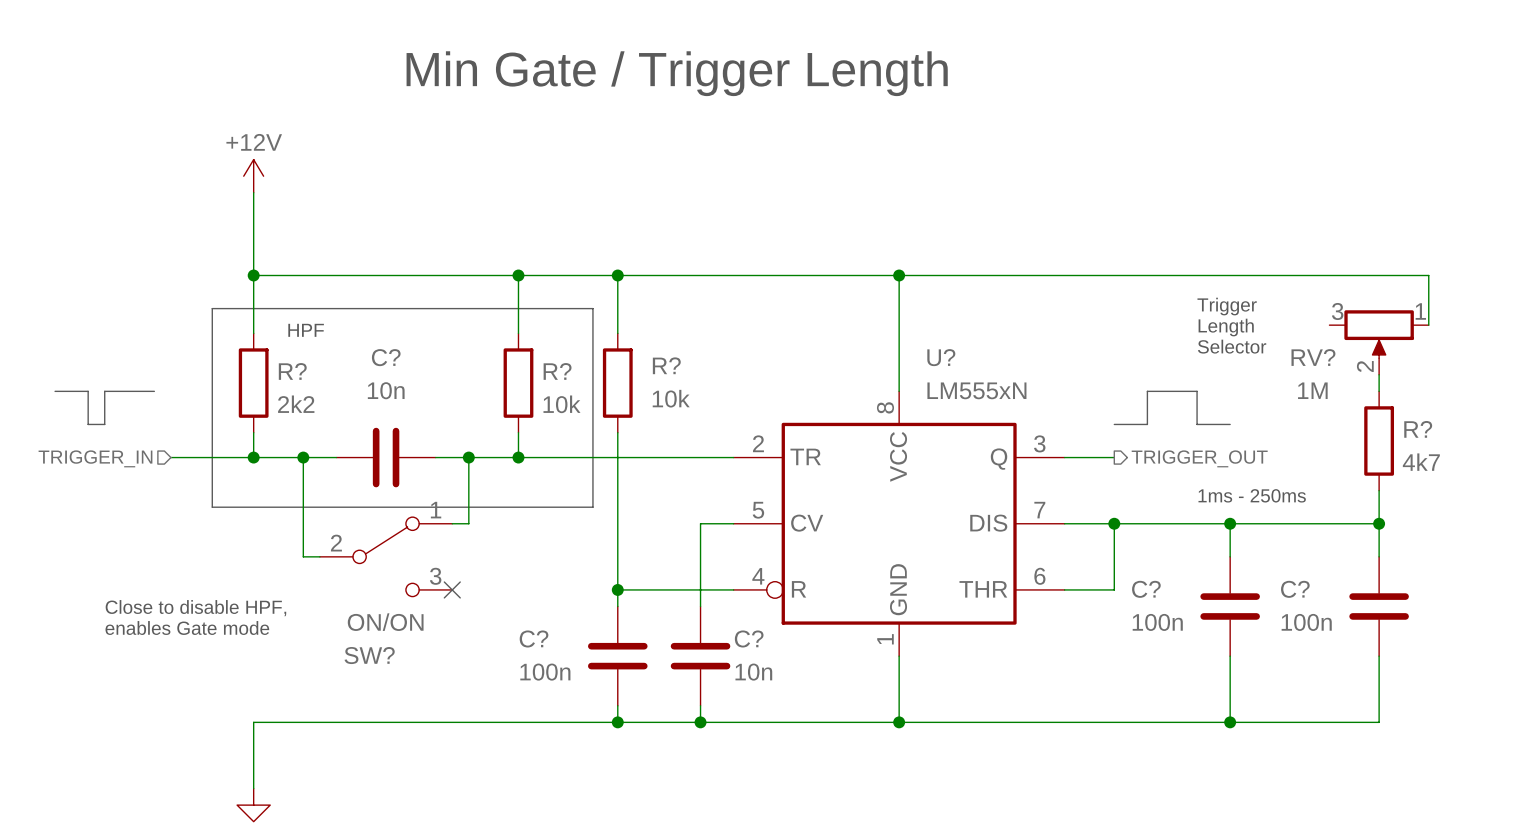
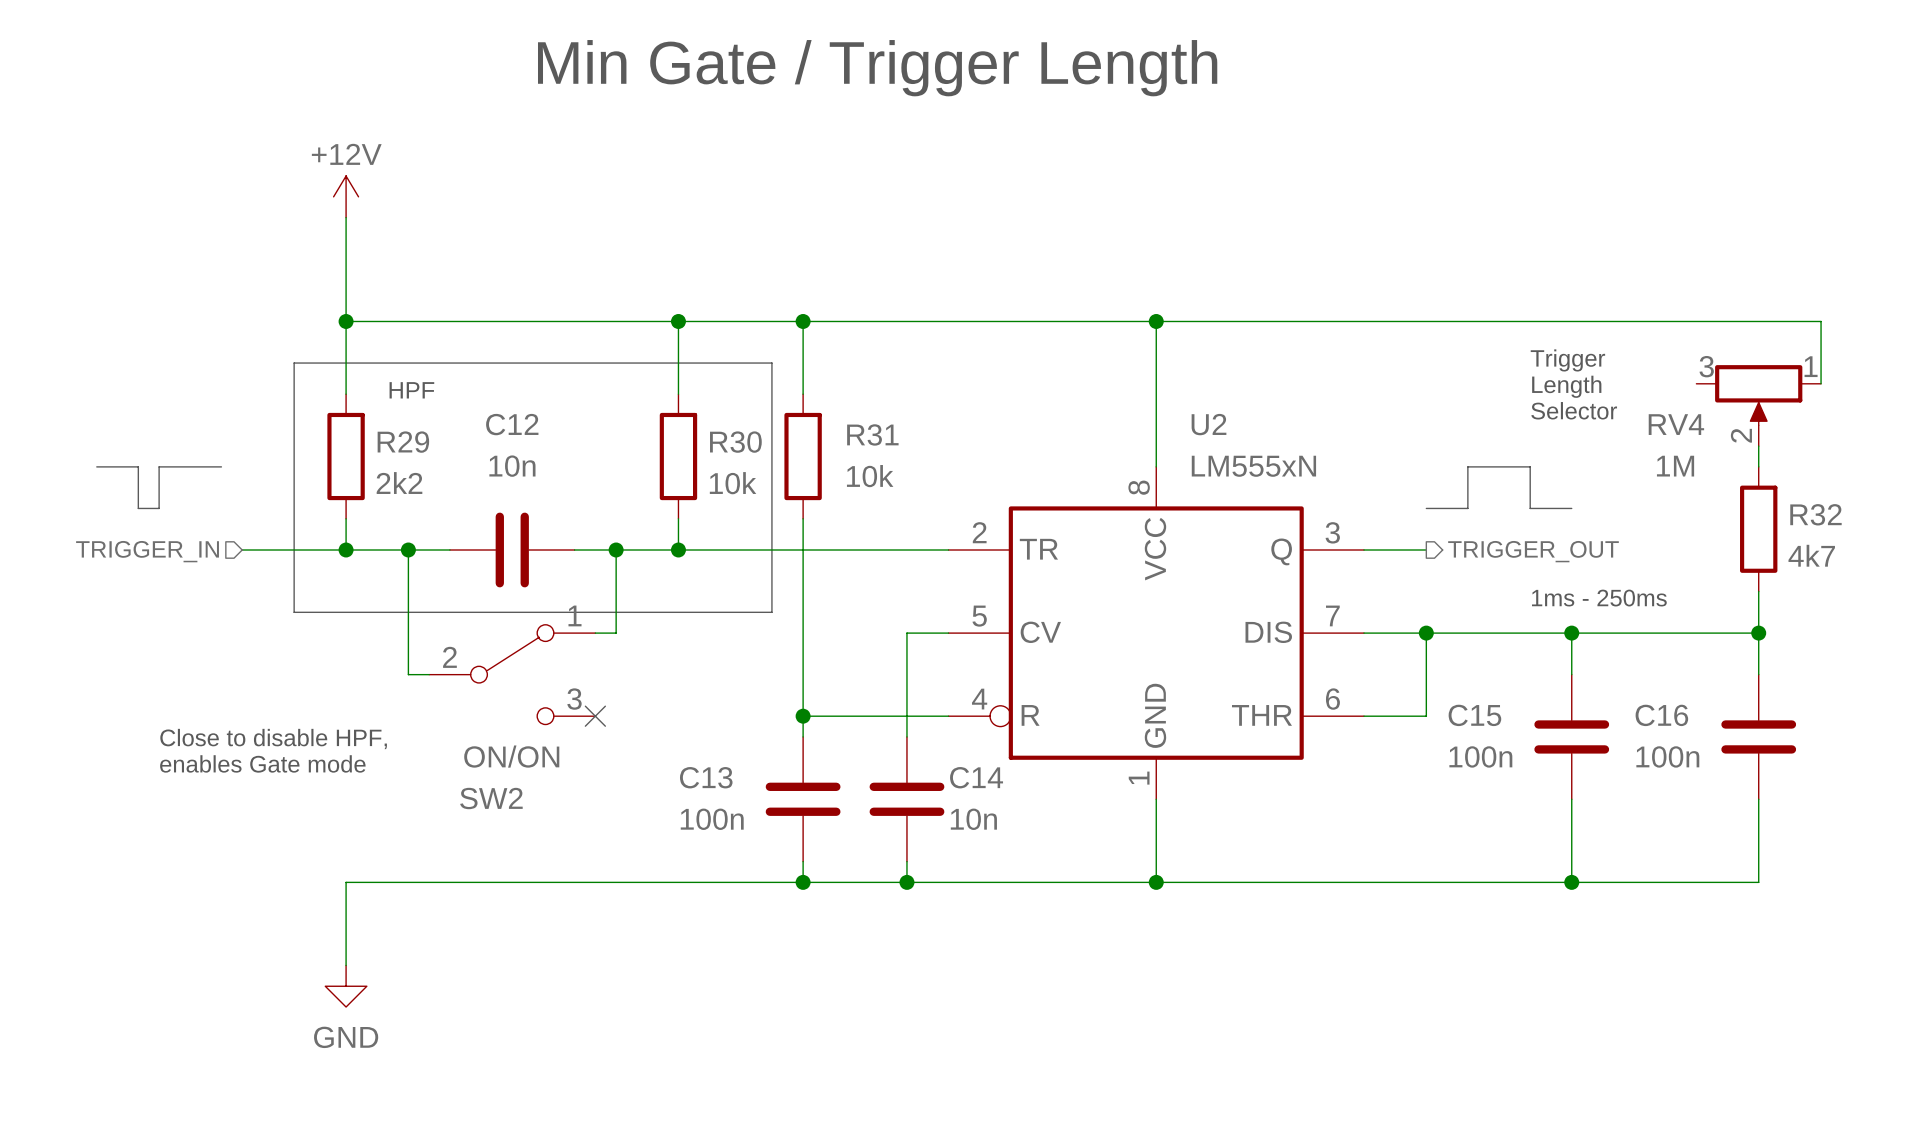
C? name: C? (386, 357) -> C12 (512, 424)
U? name: U? (941, 357) -> U2 (1209, 424)
RV? name: RV? (1313, 357) -> RV4 (1676, 424)
R? name: R? (666, 365) -> R31 (872, 434)
R? name: R? (292, 371) -> R29 (403, 442)
R? name: R? (557, 371) -> R30 (735, 442)
R? name: R? (1418, 429) -> R32 (1815, 514)
C? name: C? (1146, 589) -> C15 (1474, 715)
C? name: C? (1295, 589) -> C16 (1661, 715)
C? name: C? (534, 638) -> C13 (706, 777)
C? name: C? (749, 638) -> C14 (976, 777)
SW? name: SW? (369, 655) -> SW2 (491, 798)

